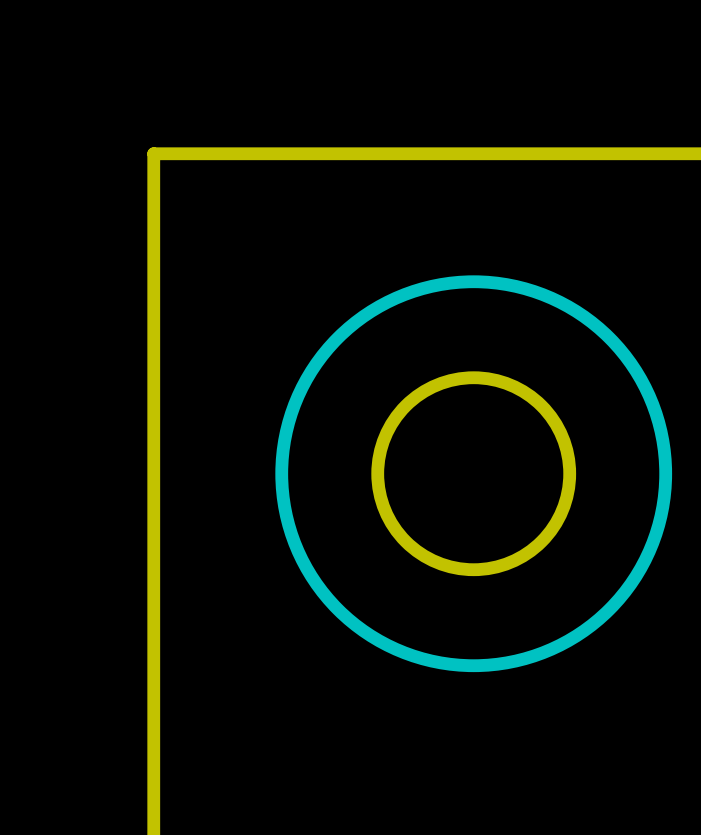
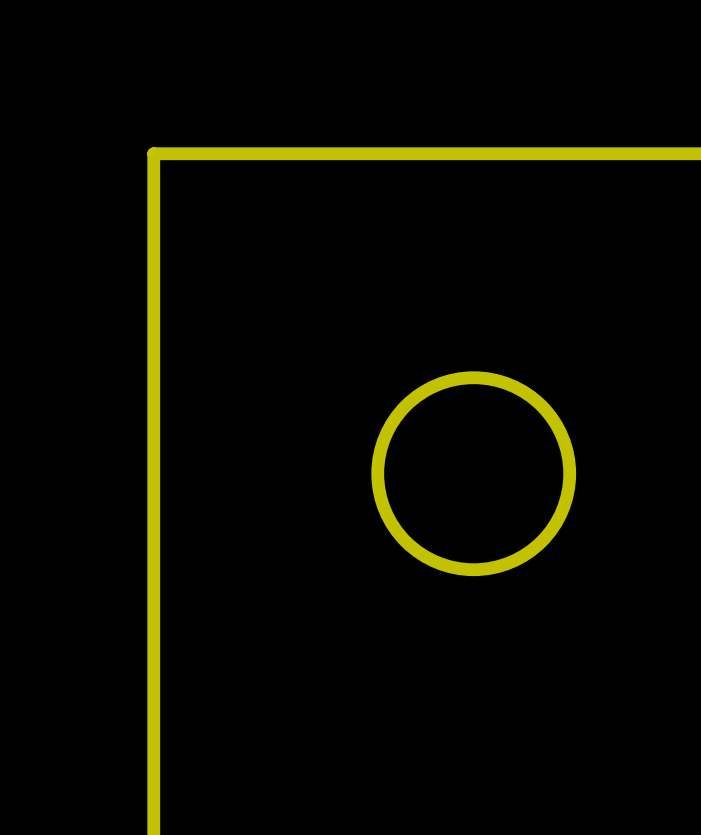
drawing: [275, 275, 673, 673] -> none

